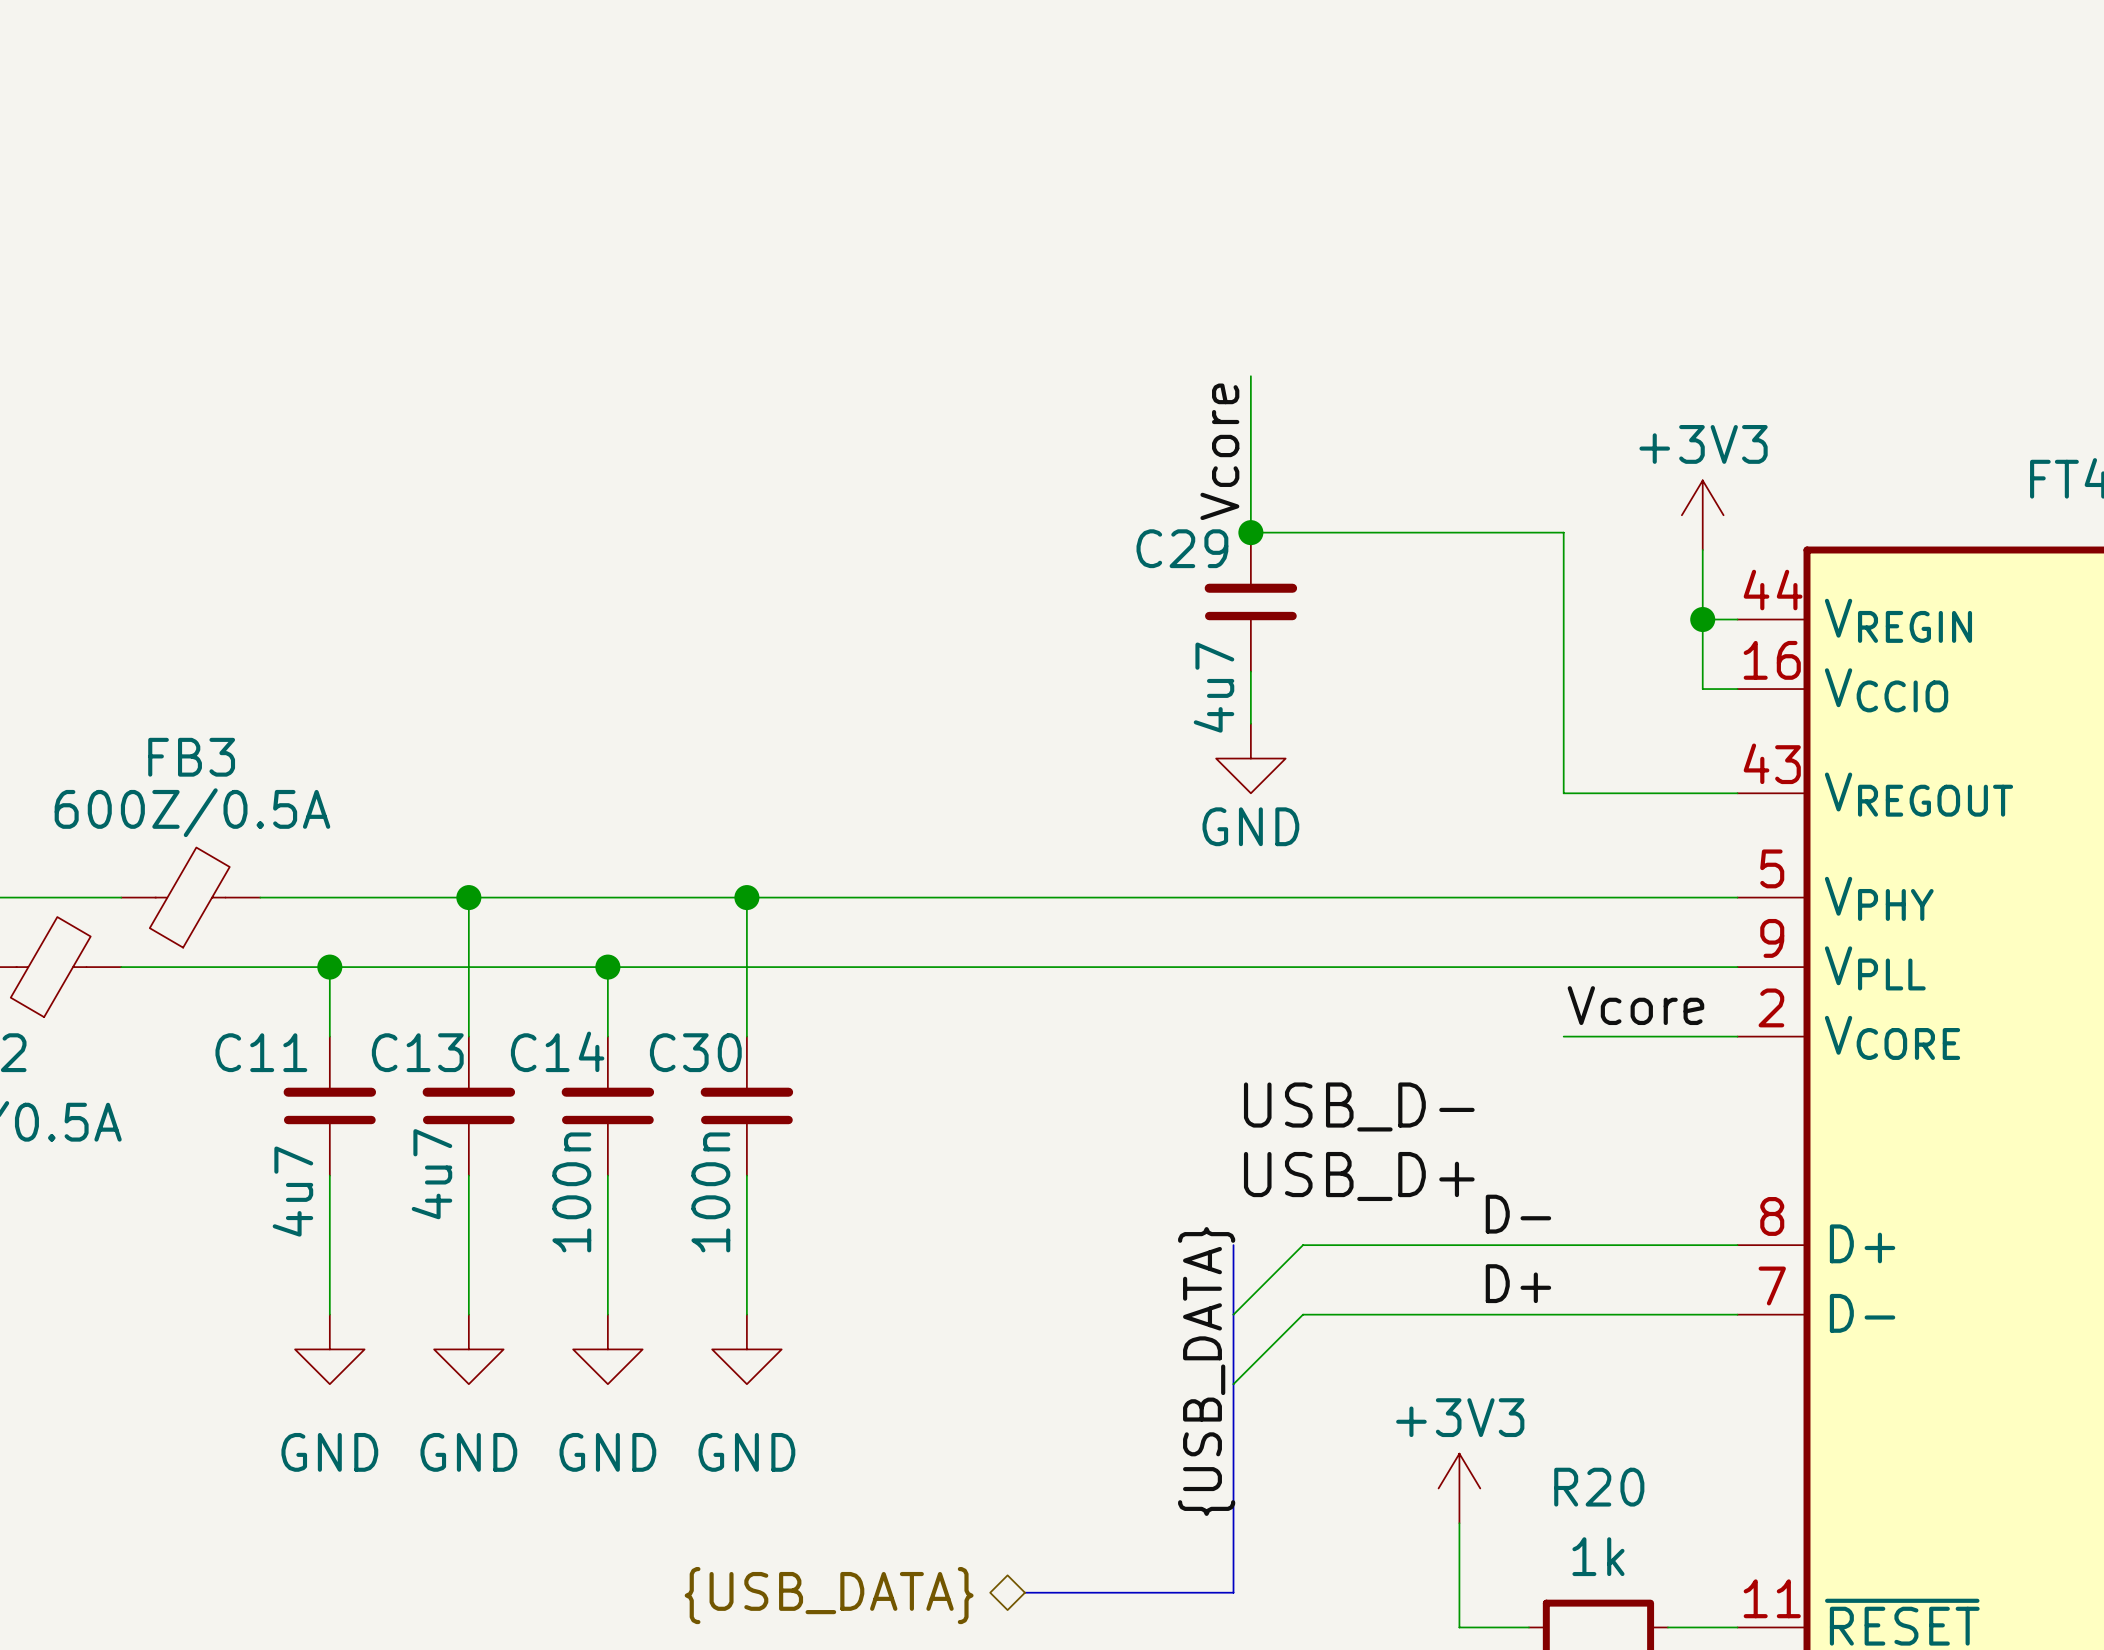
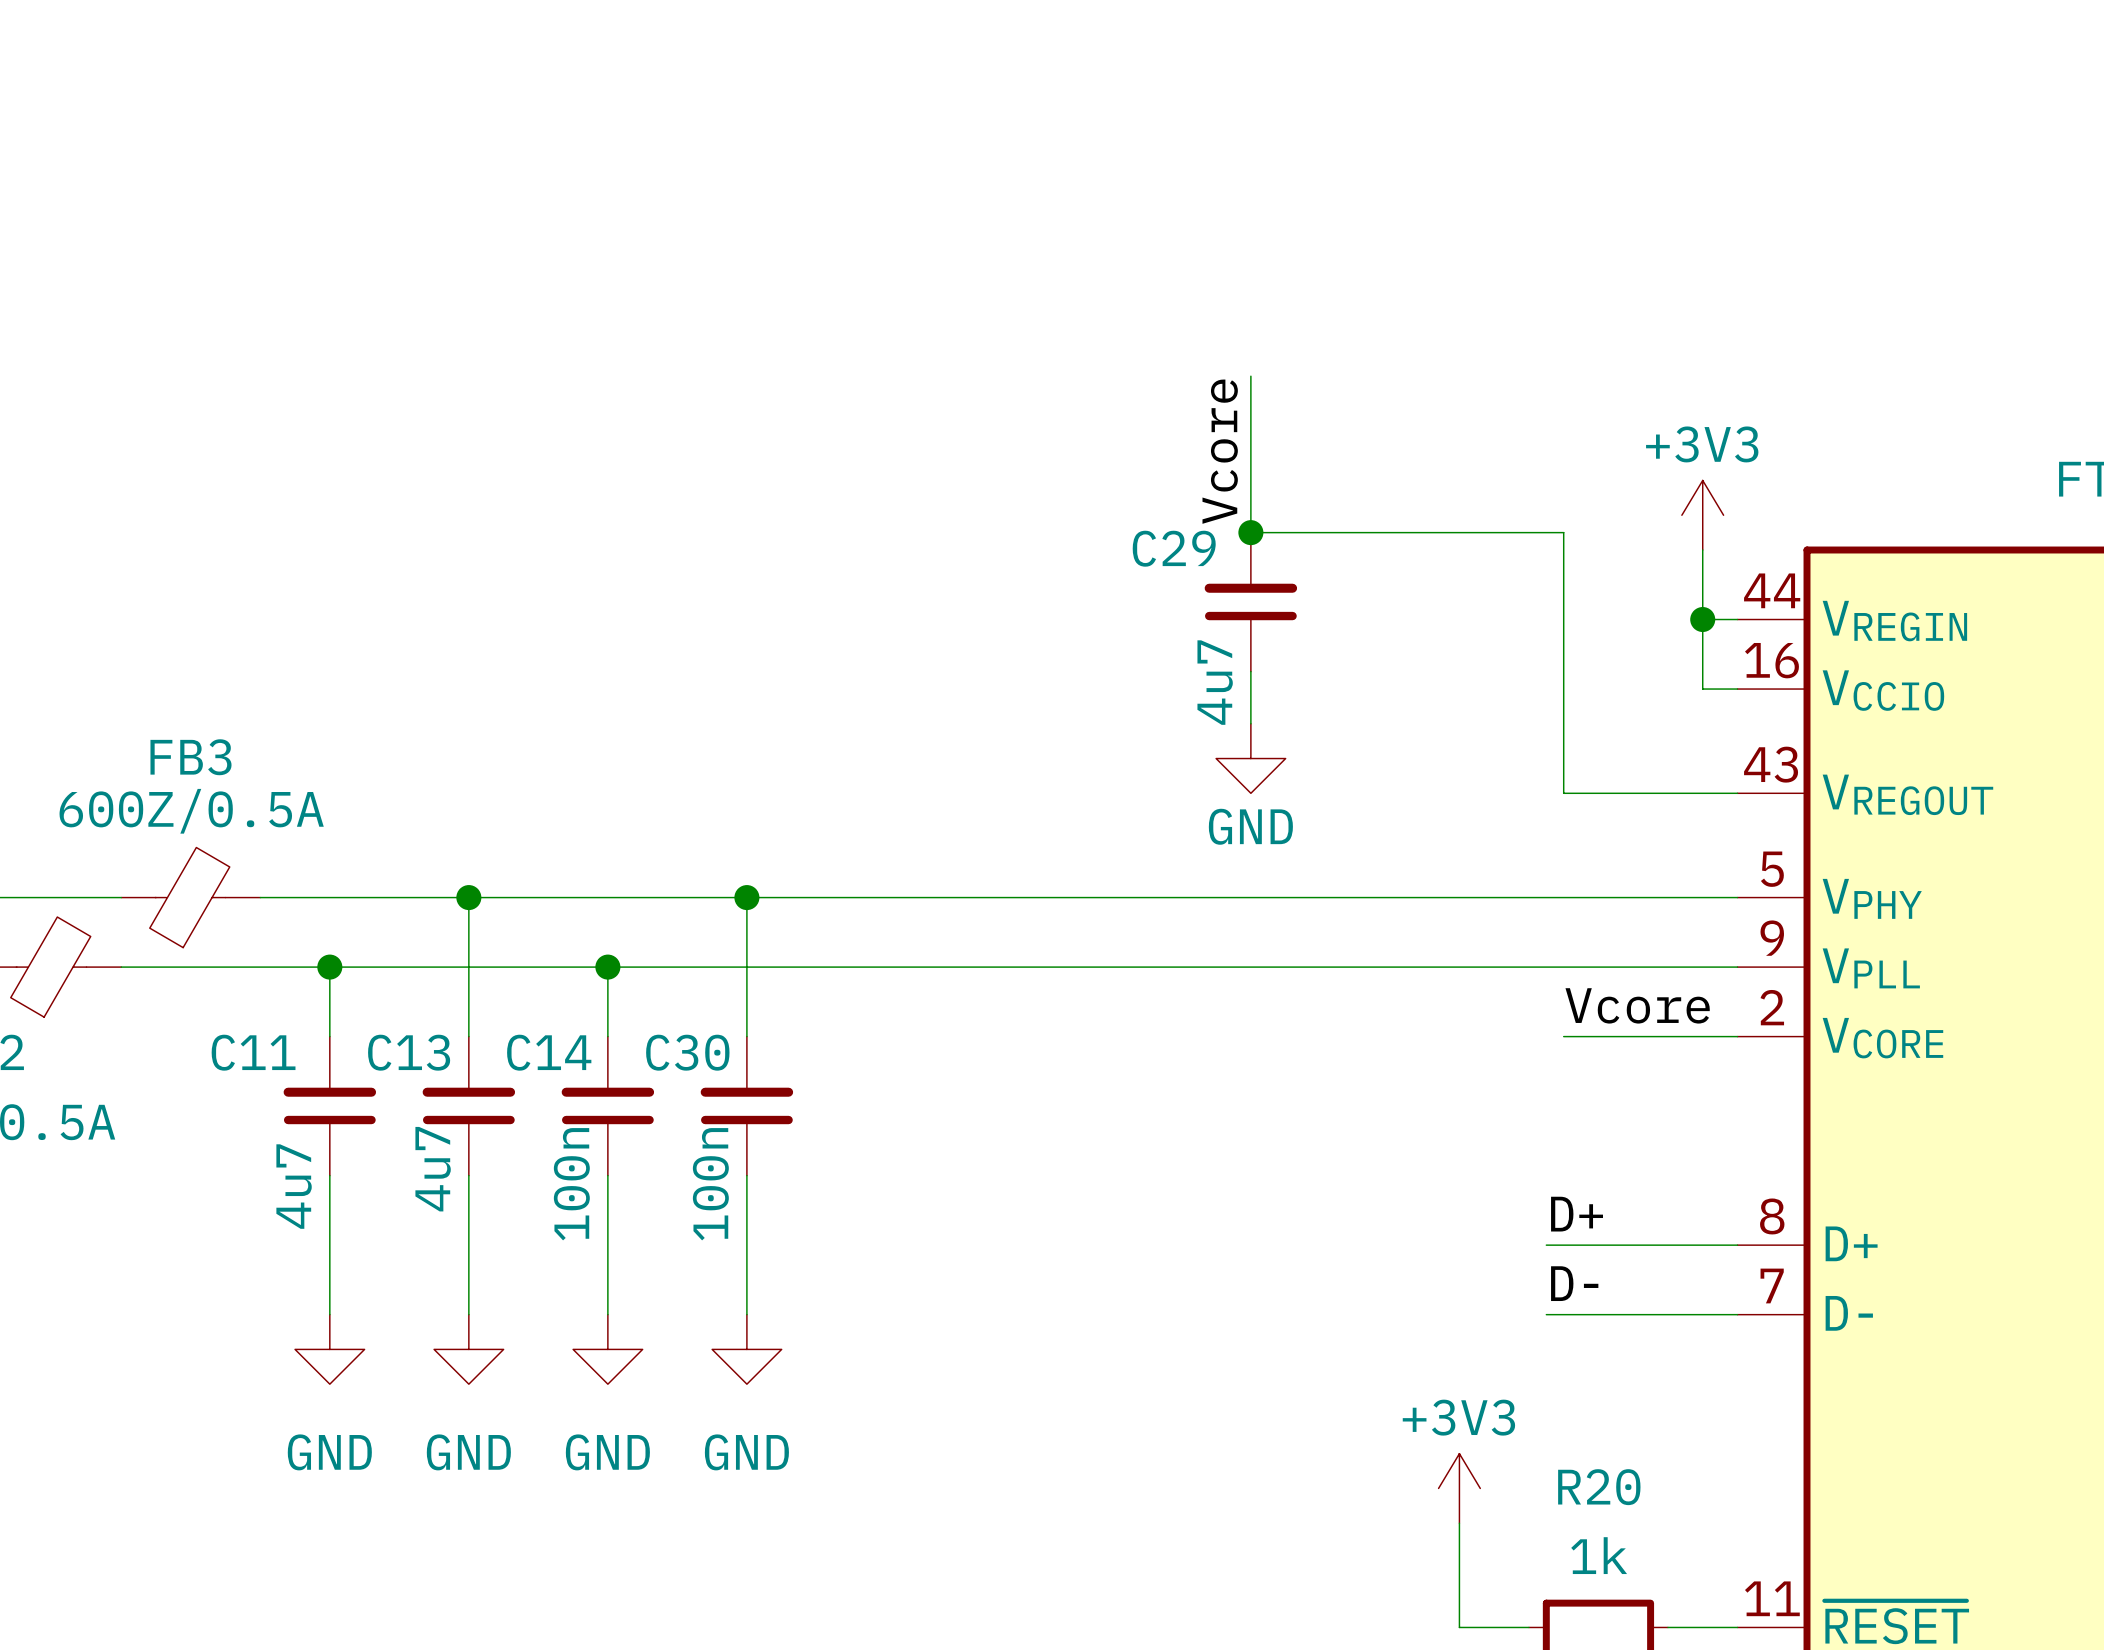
label: USB_D- (1359, 1106) -> none
label: USB_D+ (1359, 1176) -> none
label position: D- (1518, 1214) -> D- (1574, 1283)
bus: (1233, 1245) (1233, 1592) (1024, 1592) -> none
wire: (1546, 1245) (1303, 1245) (1233, 1314) -> none
label position: D+ (1518, 1283) -> D+ (1577, 1214)
wire: (1546, 1314) (1303, 1314) (1233, 1384) -> none
label: {USB_DATA} (1206, 1371) -> none
hierarchical label: {USB_DATA} (829, 1595) -> none

